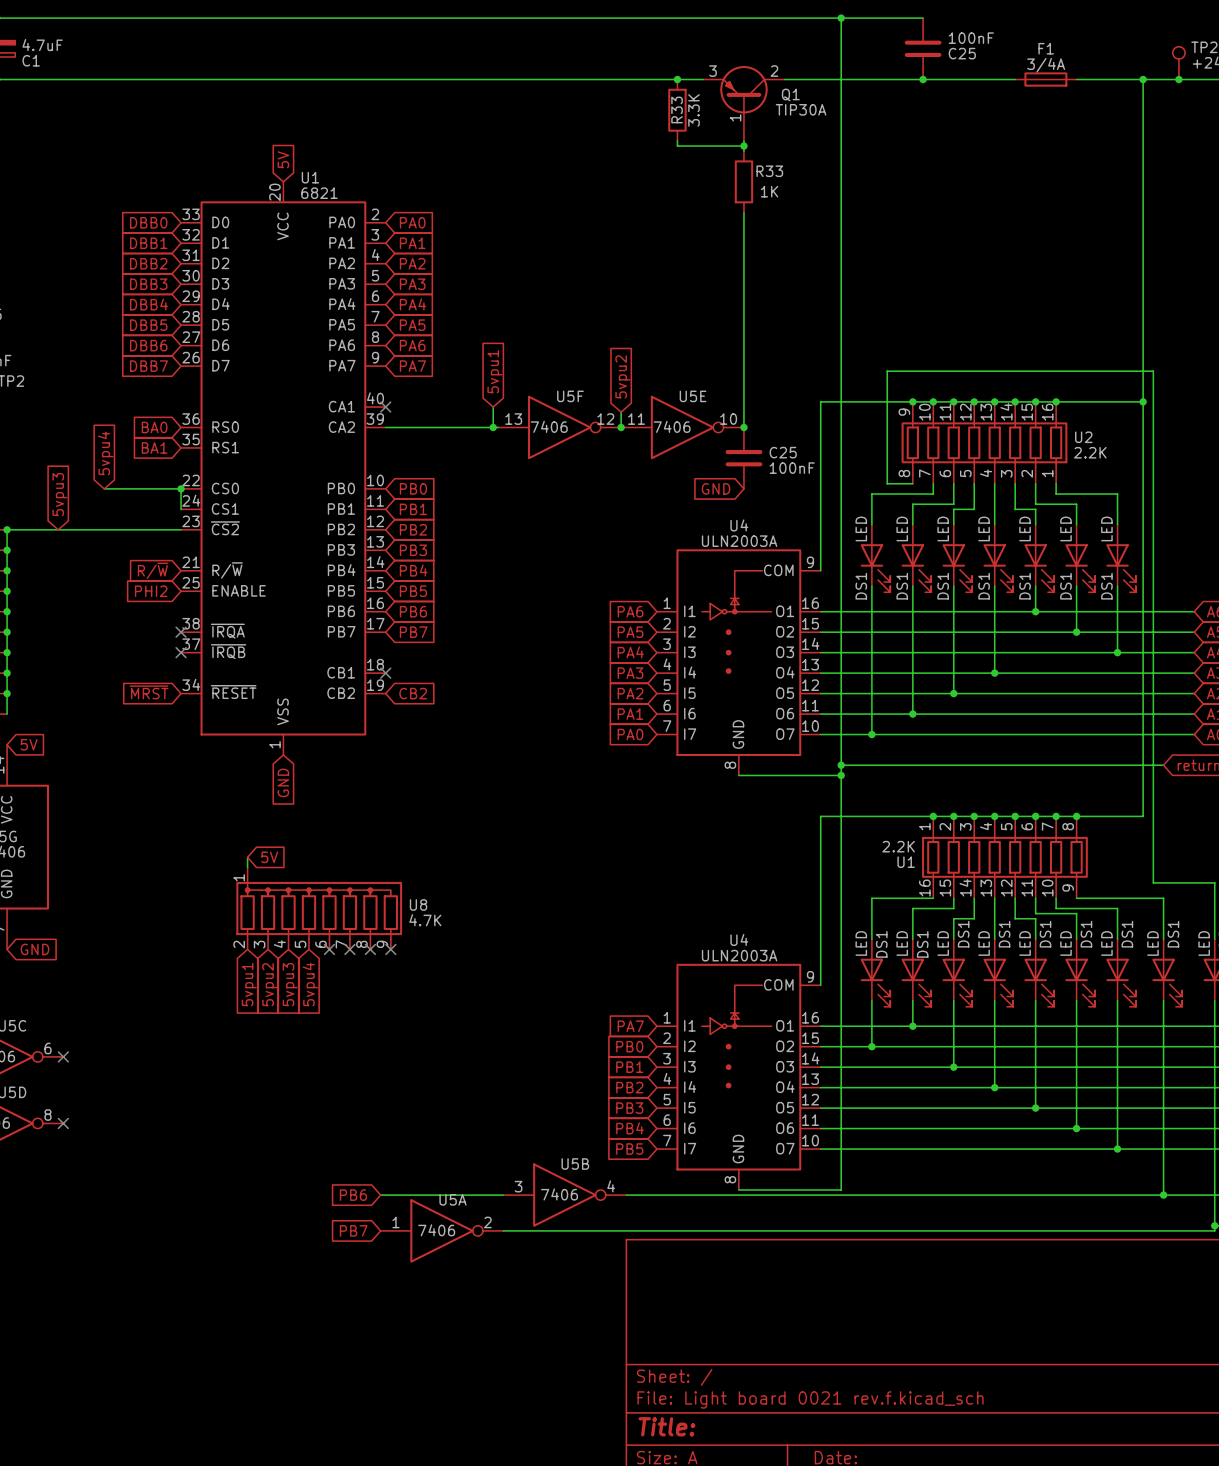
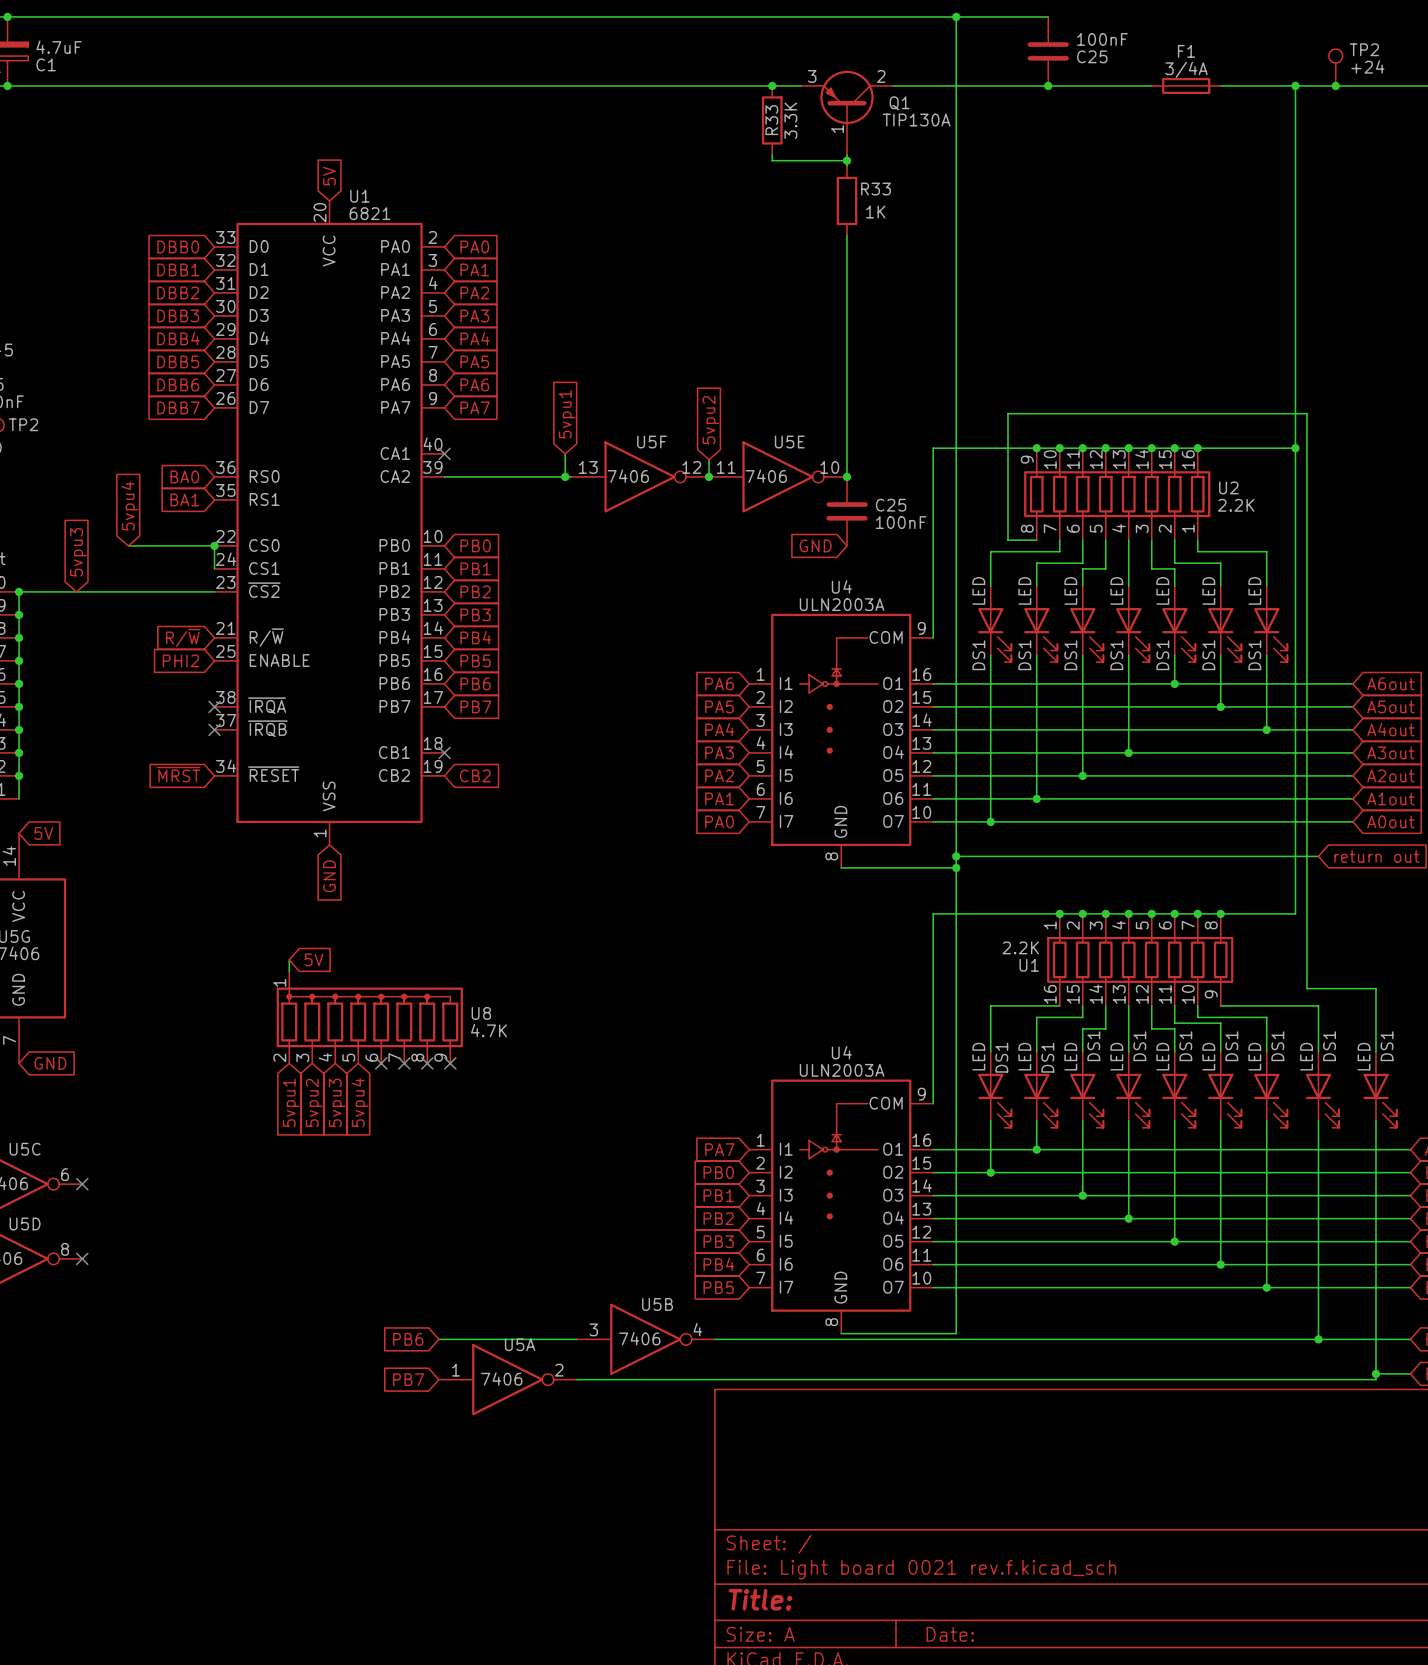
Q1 value: TIP30A (801, 109) -> TIP130A (916, 120)

